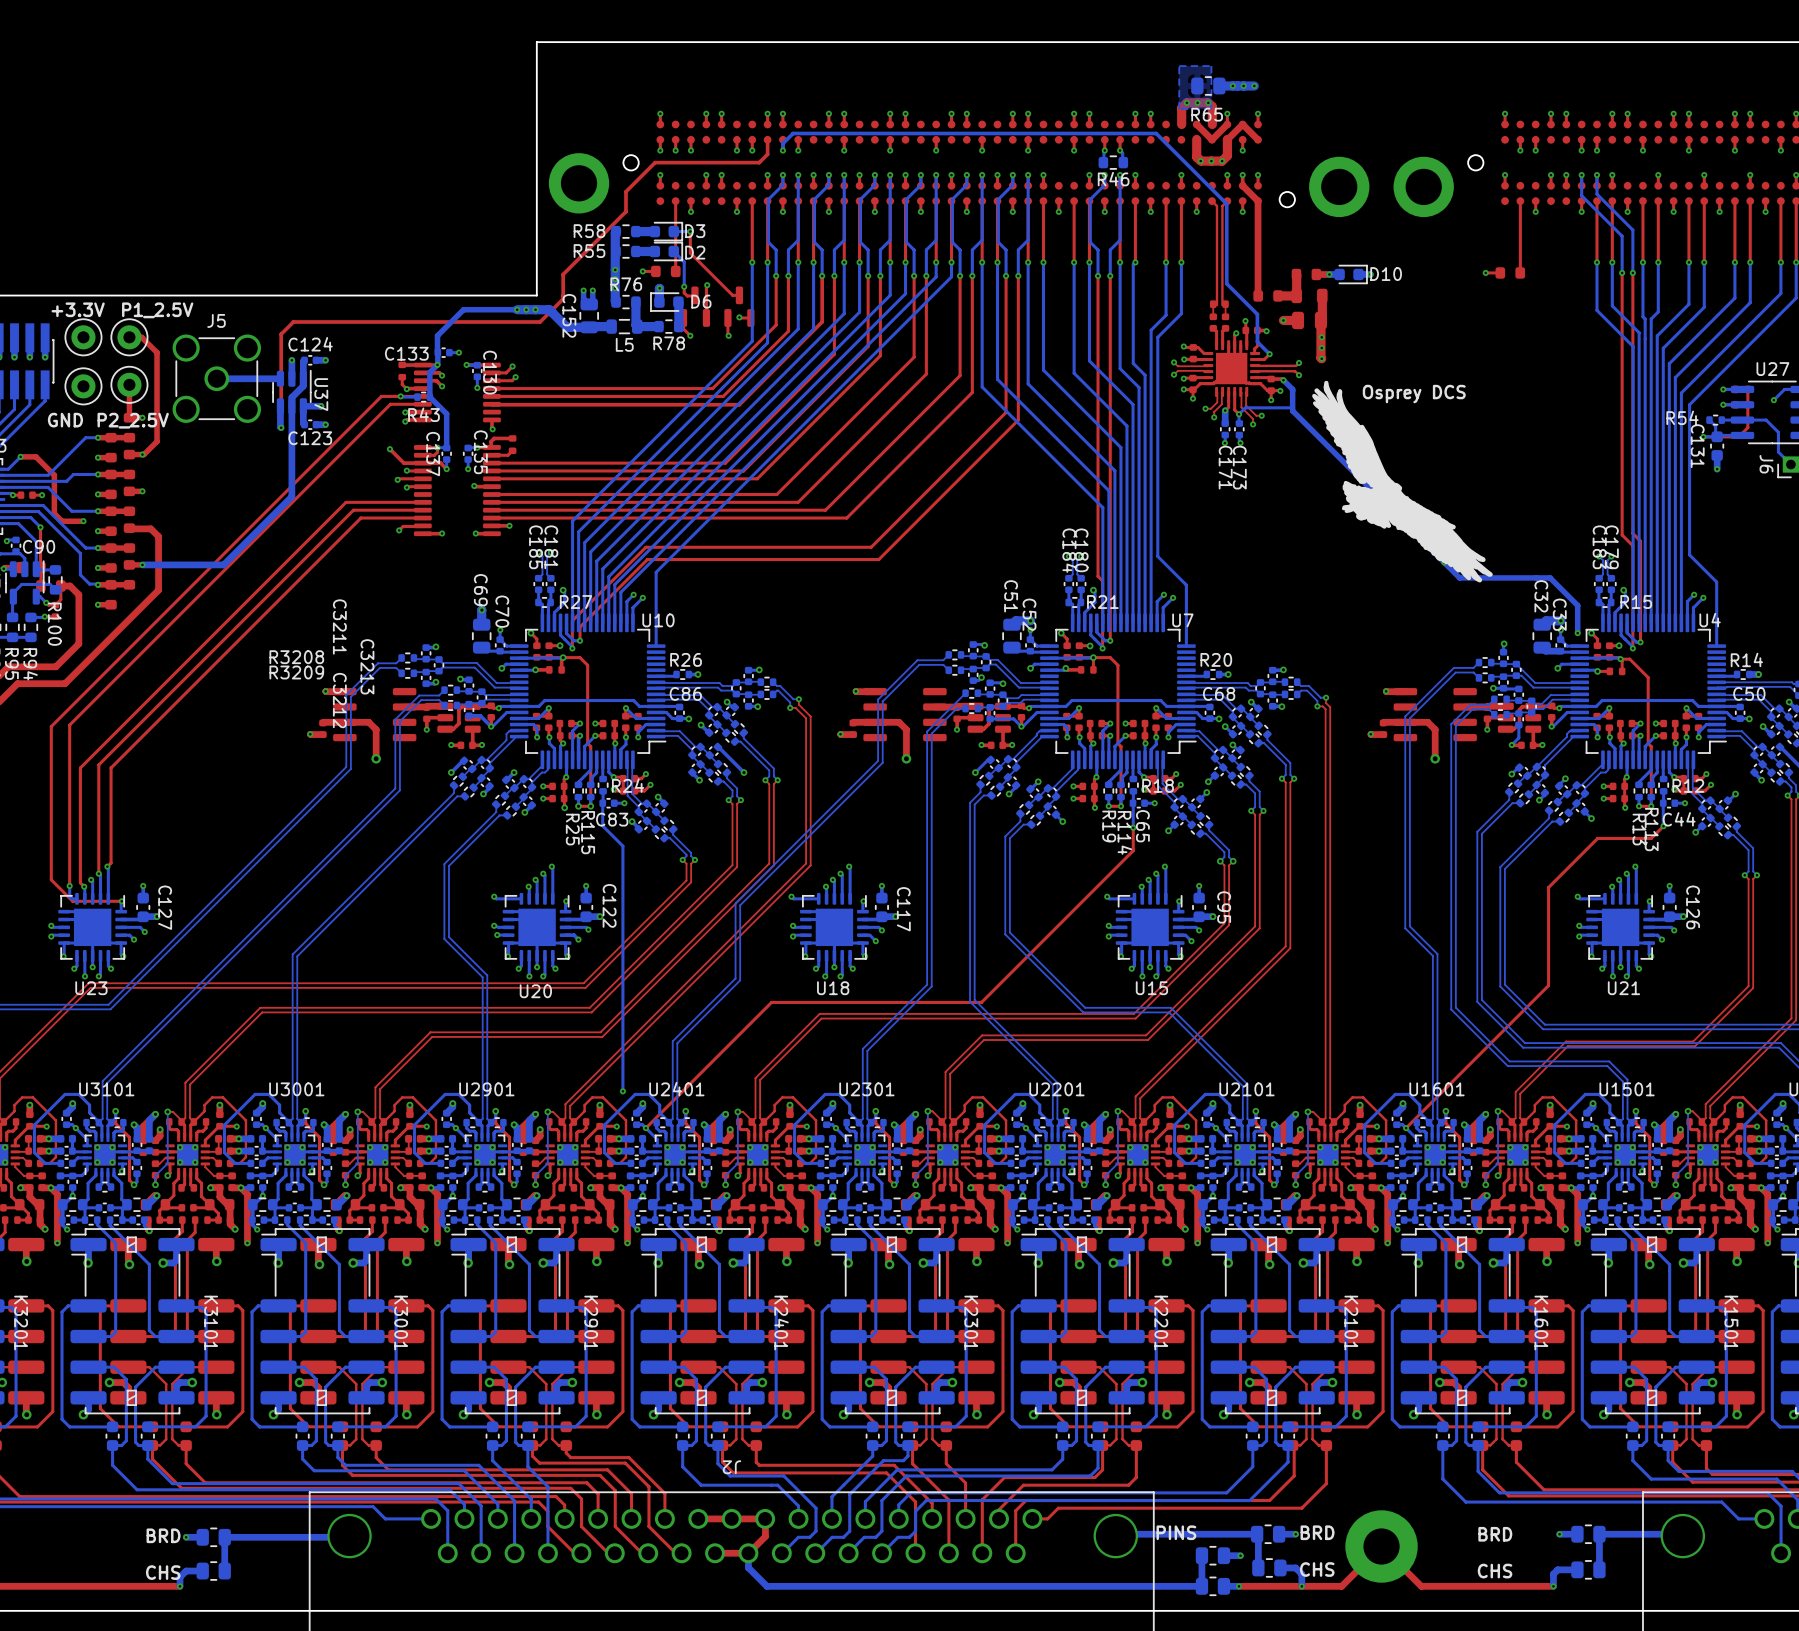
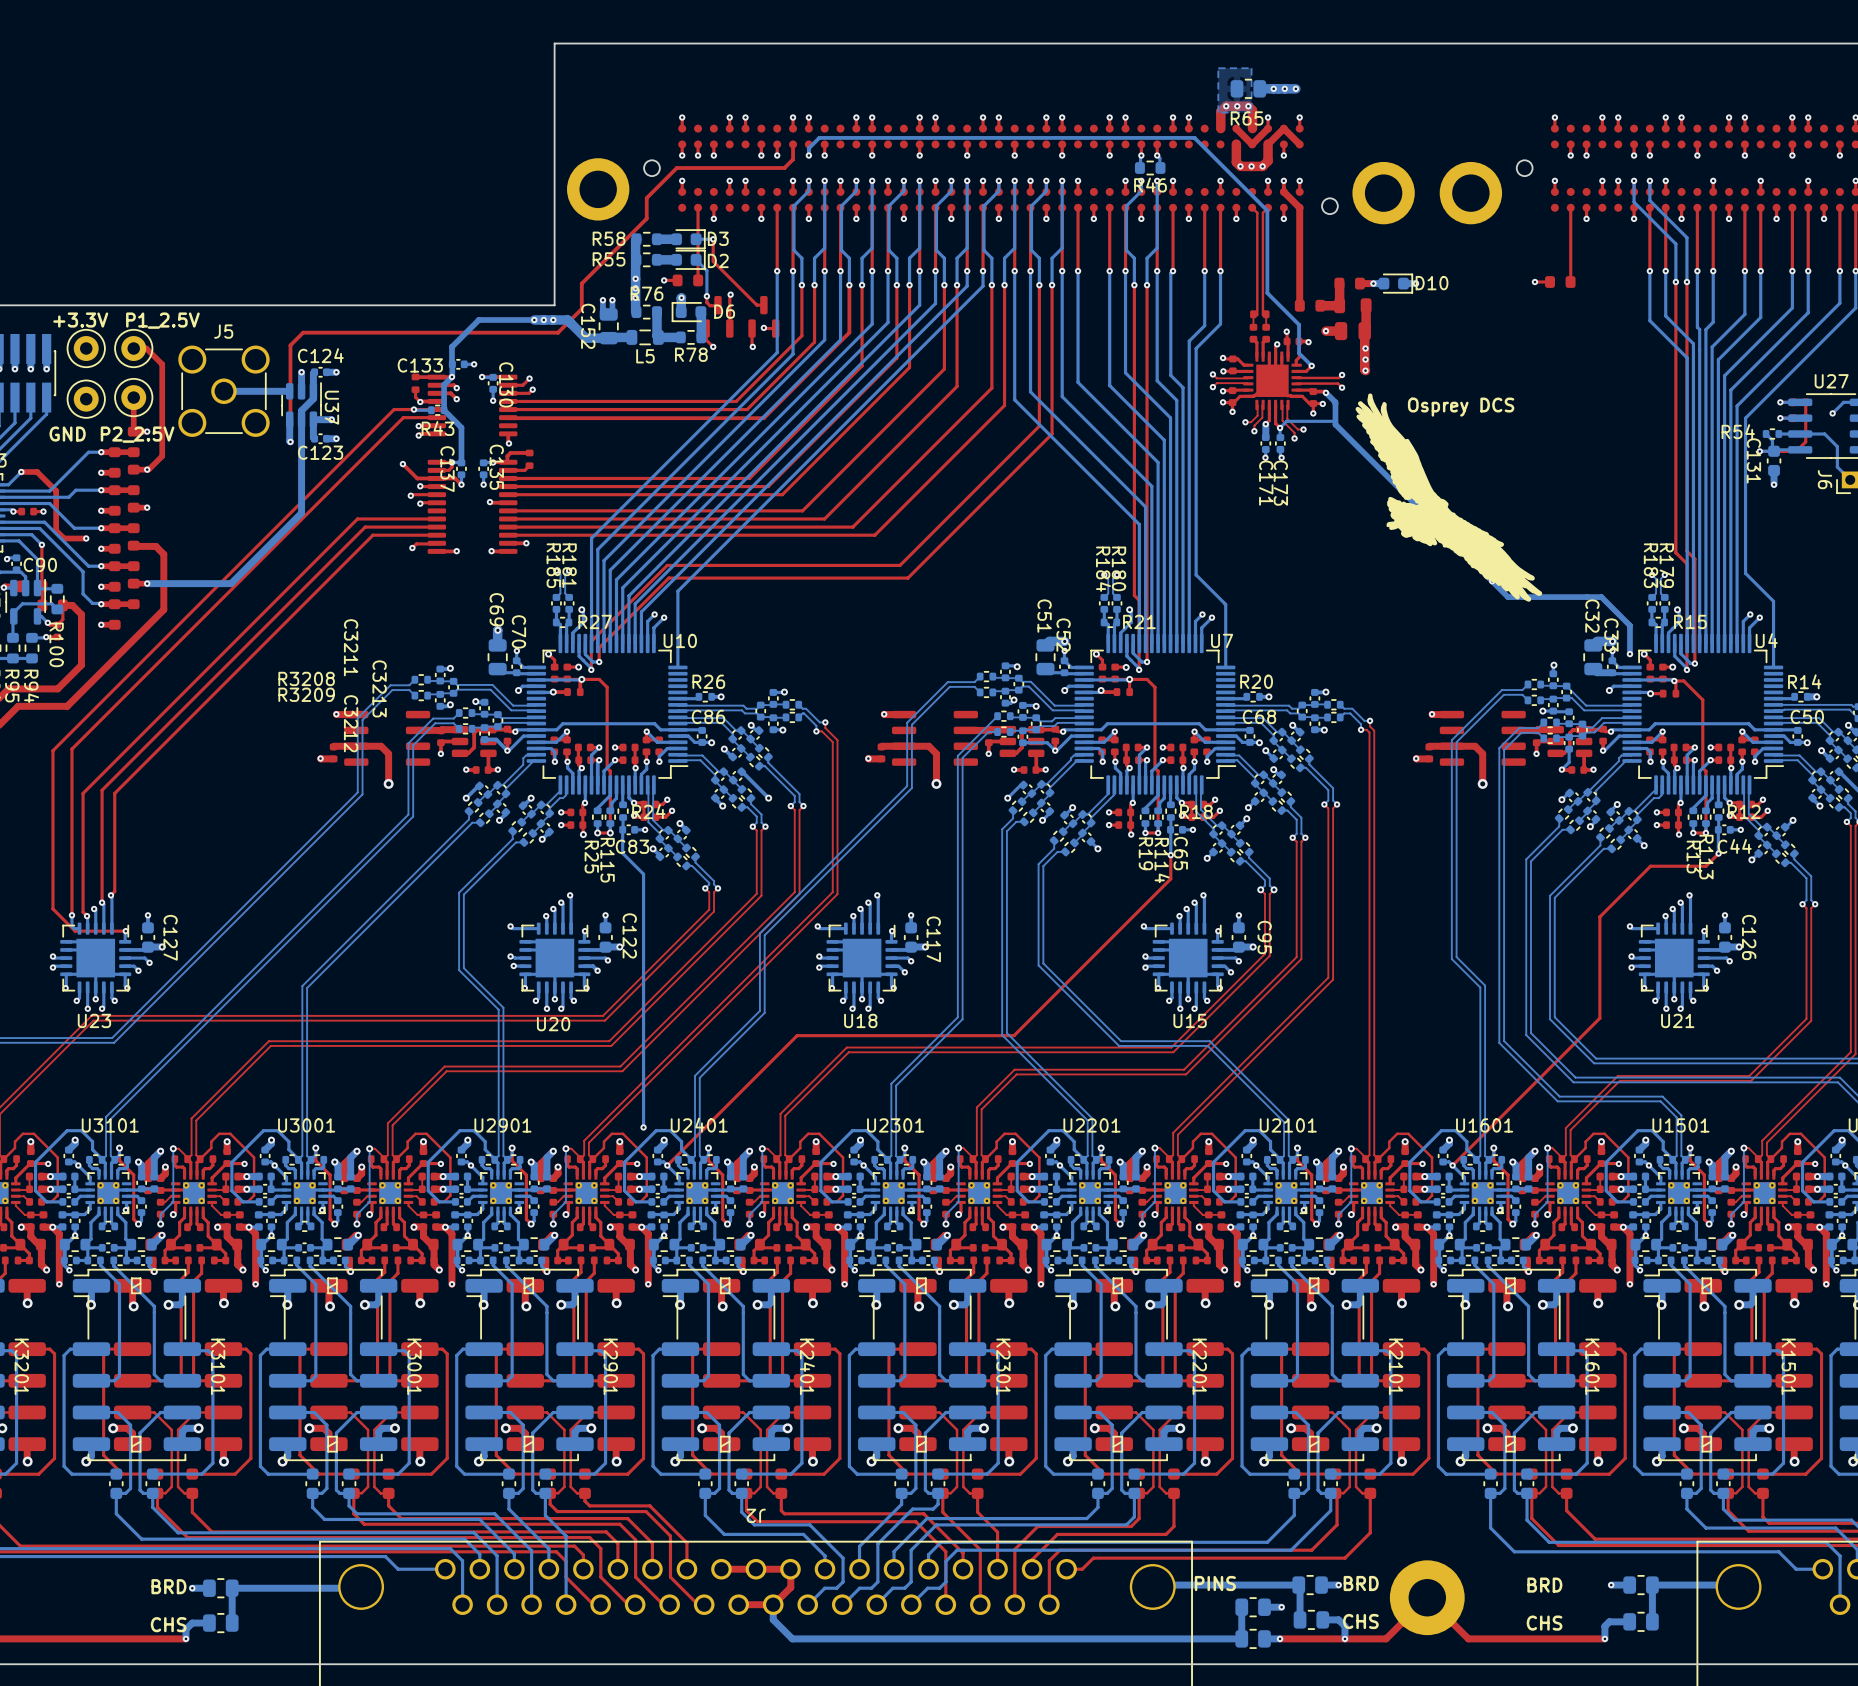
C185 name: C185 (536, 547) -> R185 (553, 565)
C181 name: C181 (551, 547) -> R181 (569, 565)
C183 name: C183 (1599, 547) -> R183 (1651, 565)
C179 name: C179 (1611, 547) -> R179 (1666, 565)
C184 name: C184 (1069, 550) -> R184 (1103, 569)
C180 name: C180 (1081, 550) -> R180 (1119, 568)

